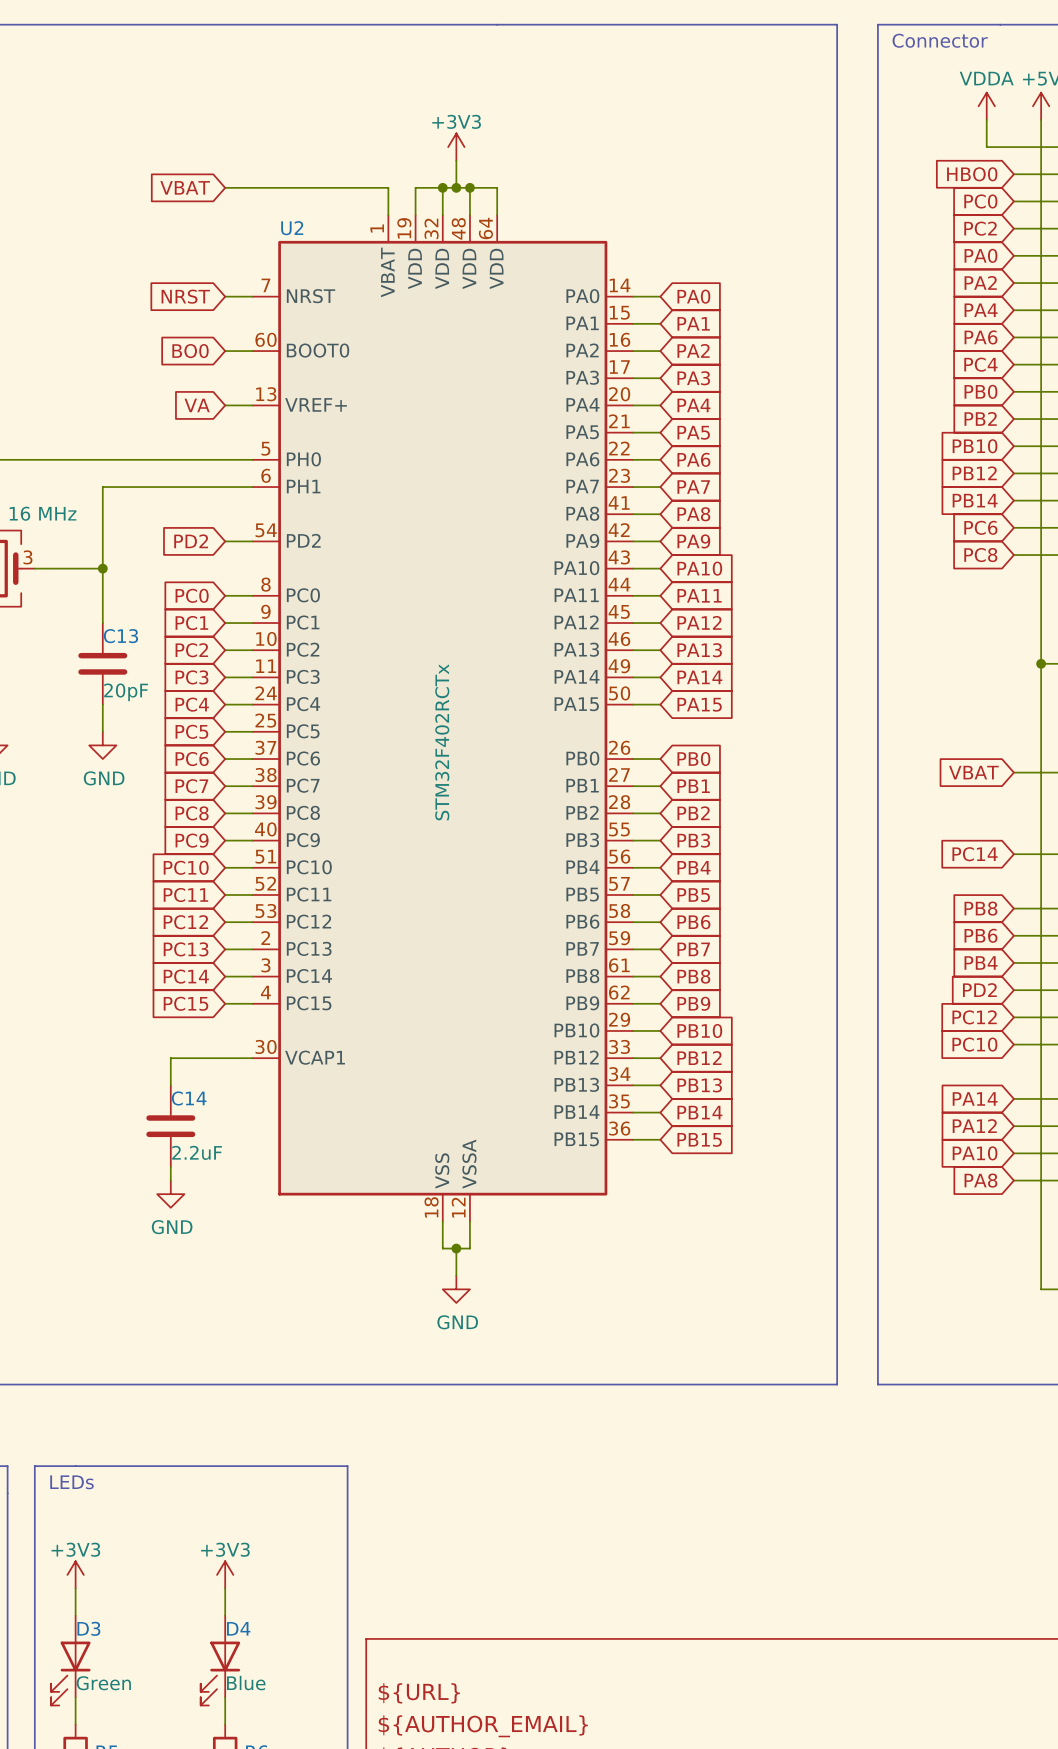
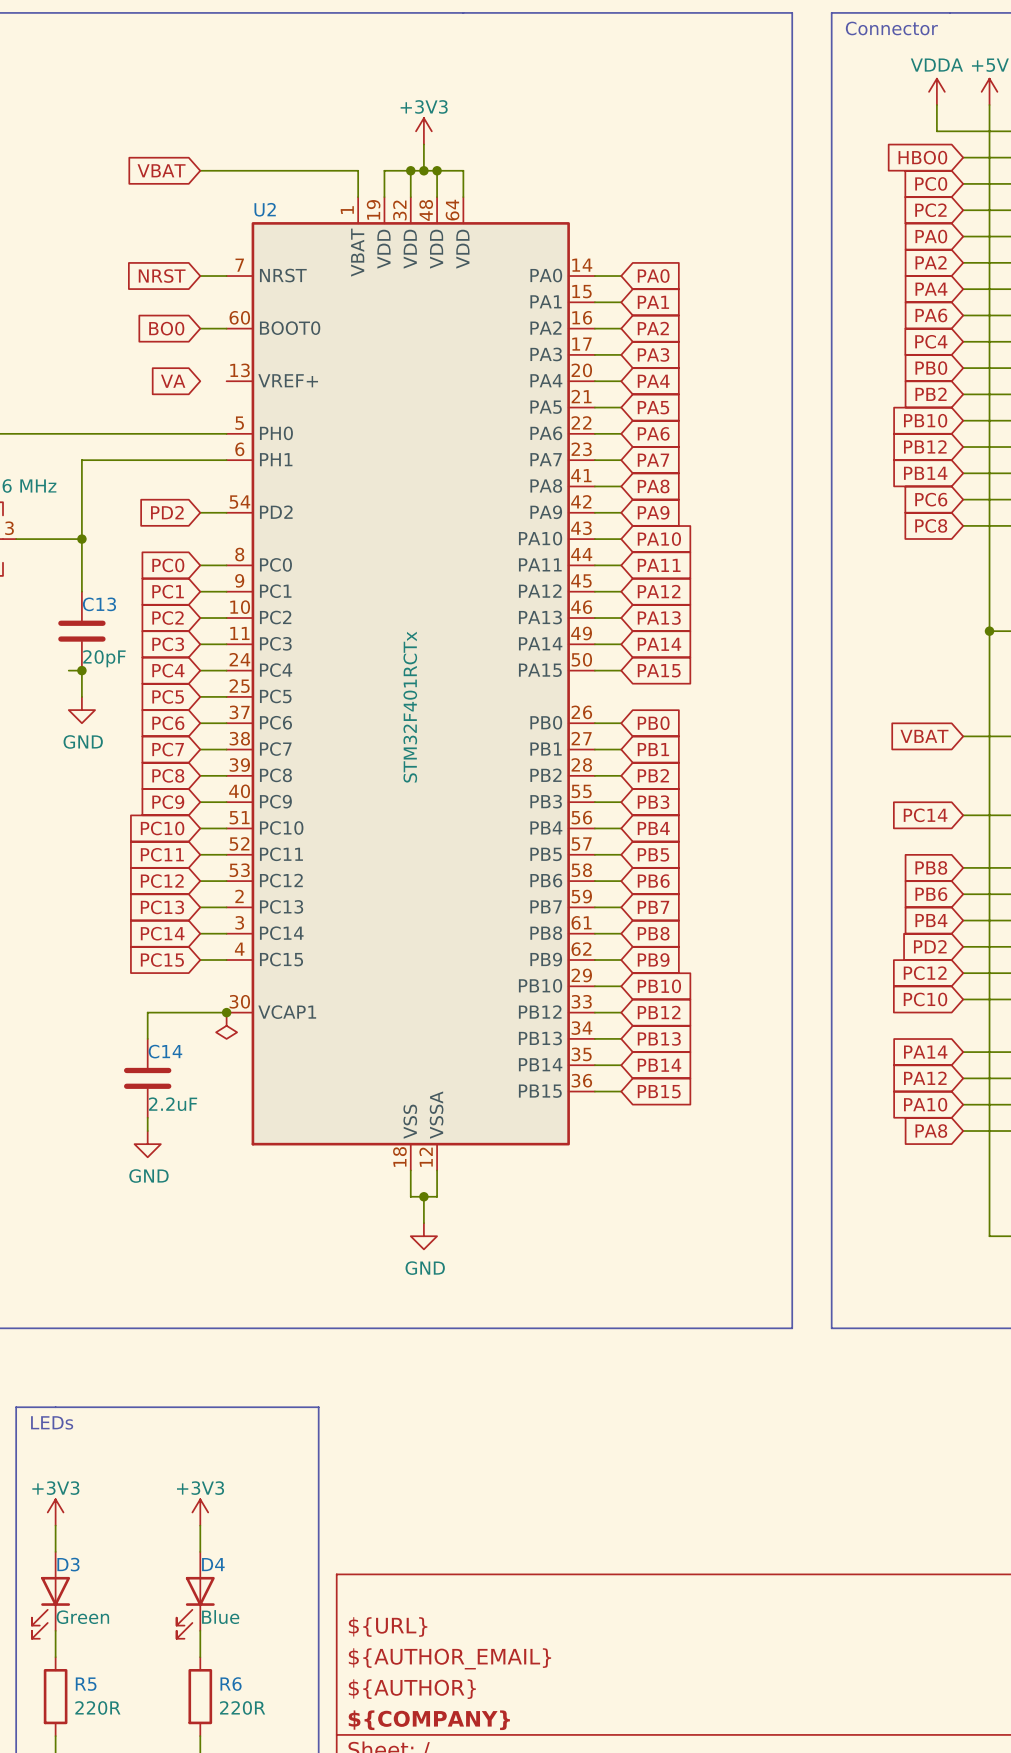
wire: (225, 405) (252, 405) -> none
wire: none -> (68, 670) (81, 670)
junction: none -> (81, 670)
U2 value: STM32F402RCTx (442, 742) -> STM32F401RCTx (410, 707)
junction: none -> (226, 1012)
power symbol: none -> (226, 1025)

